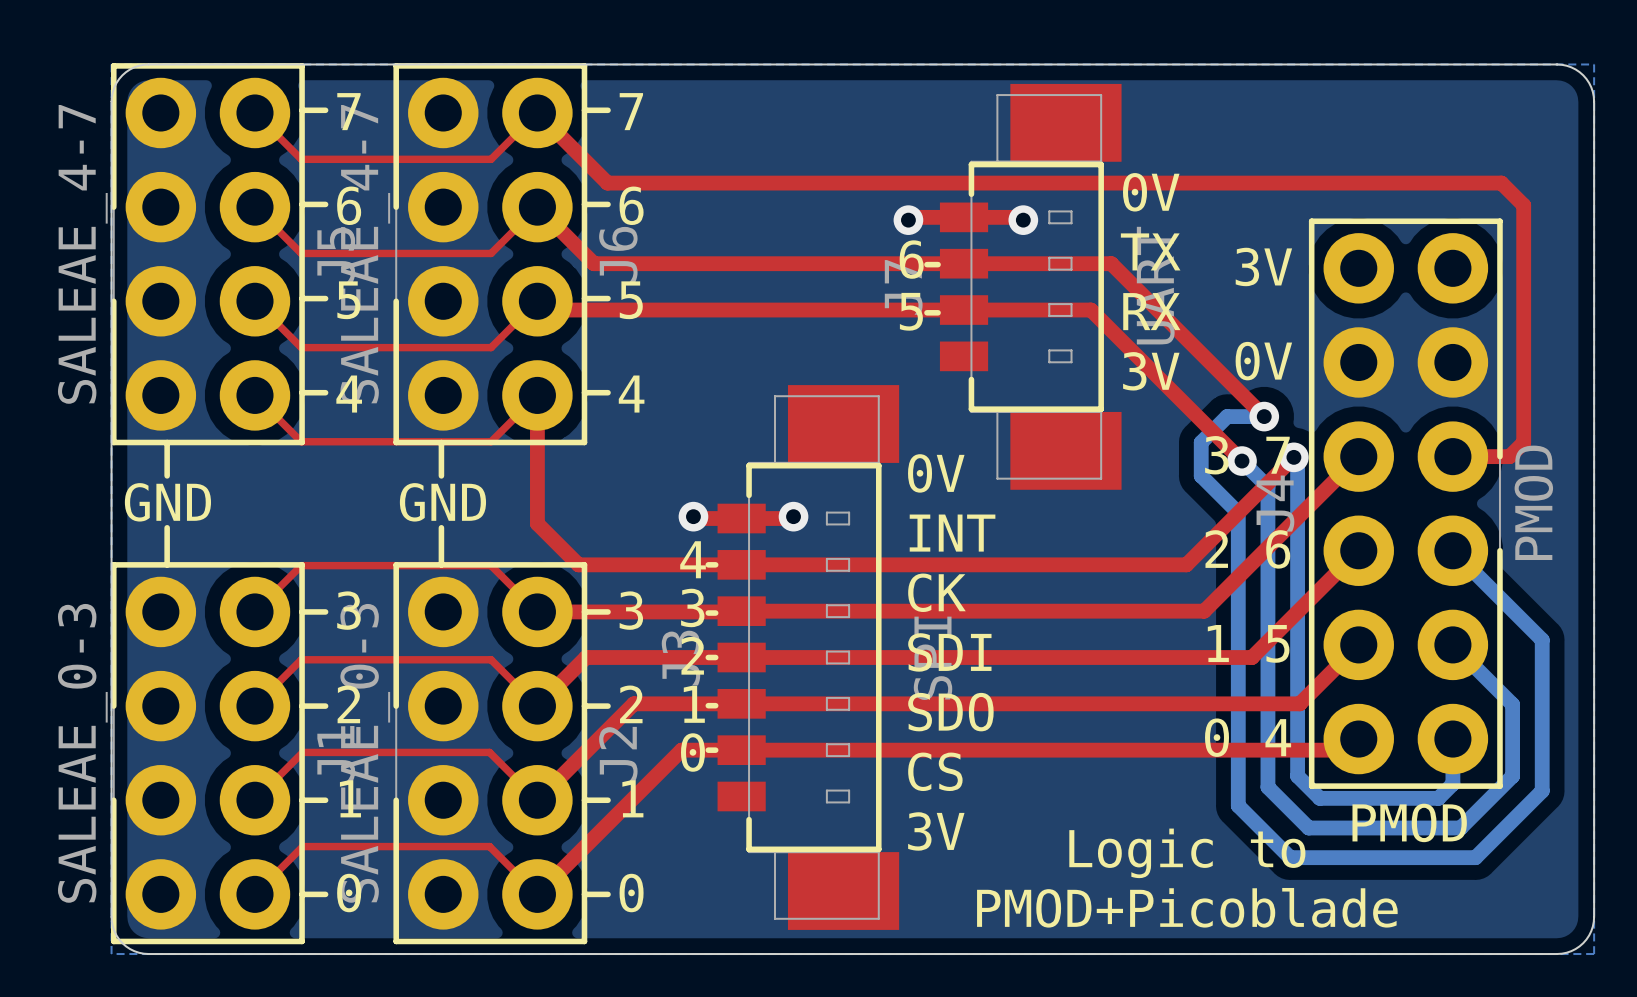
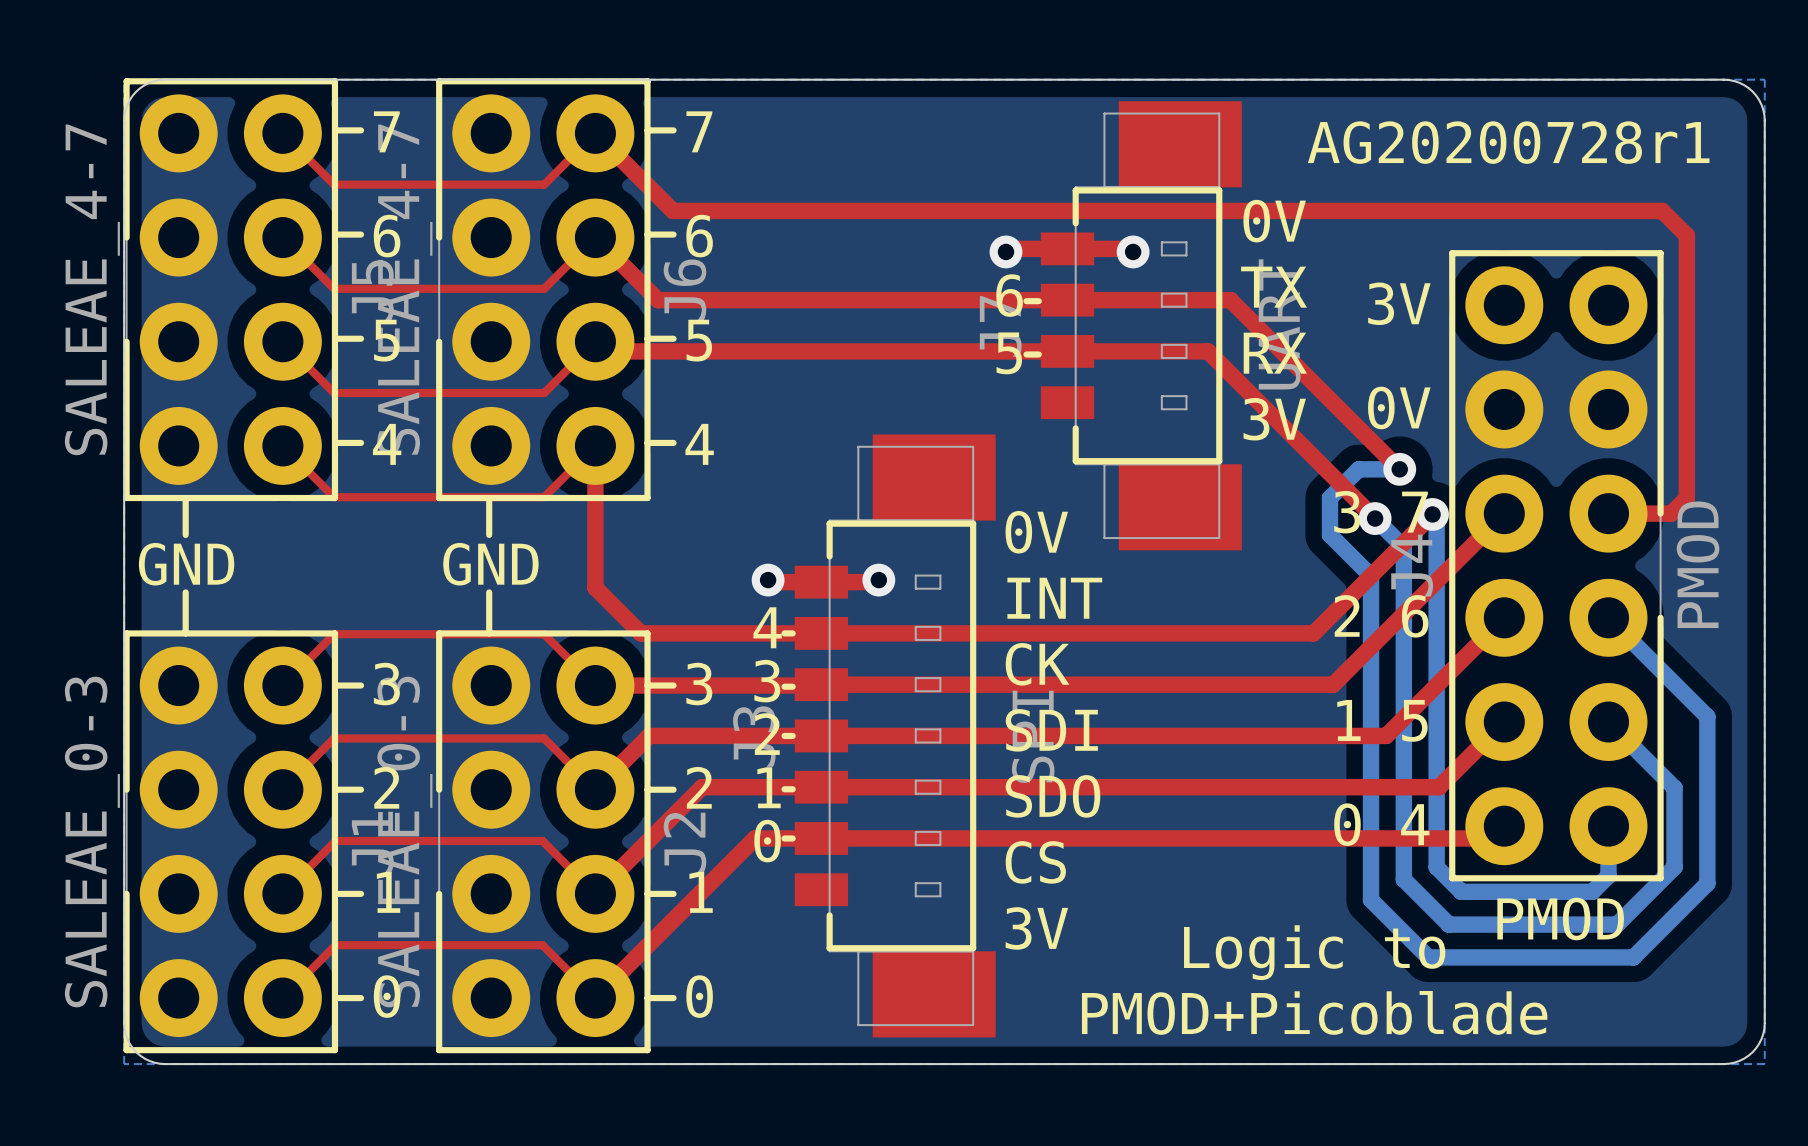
text: none -> AG20200728r1 (1508, 142)

